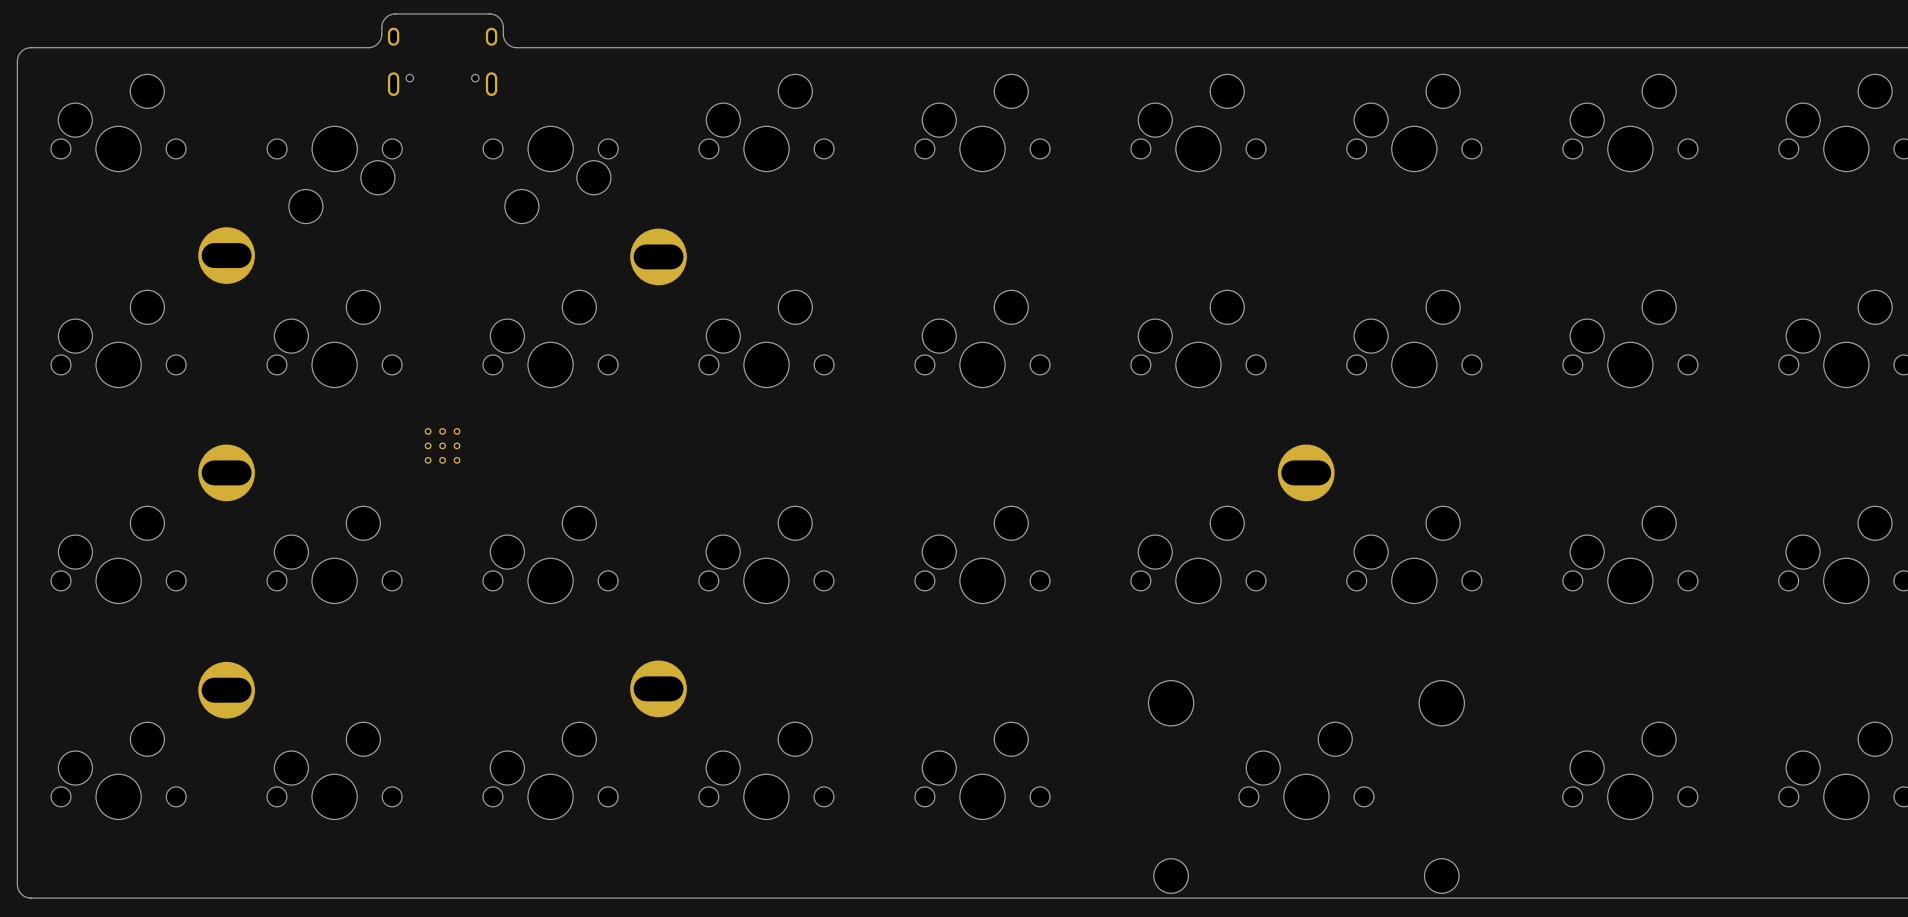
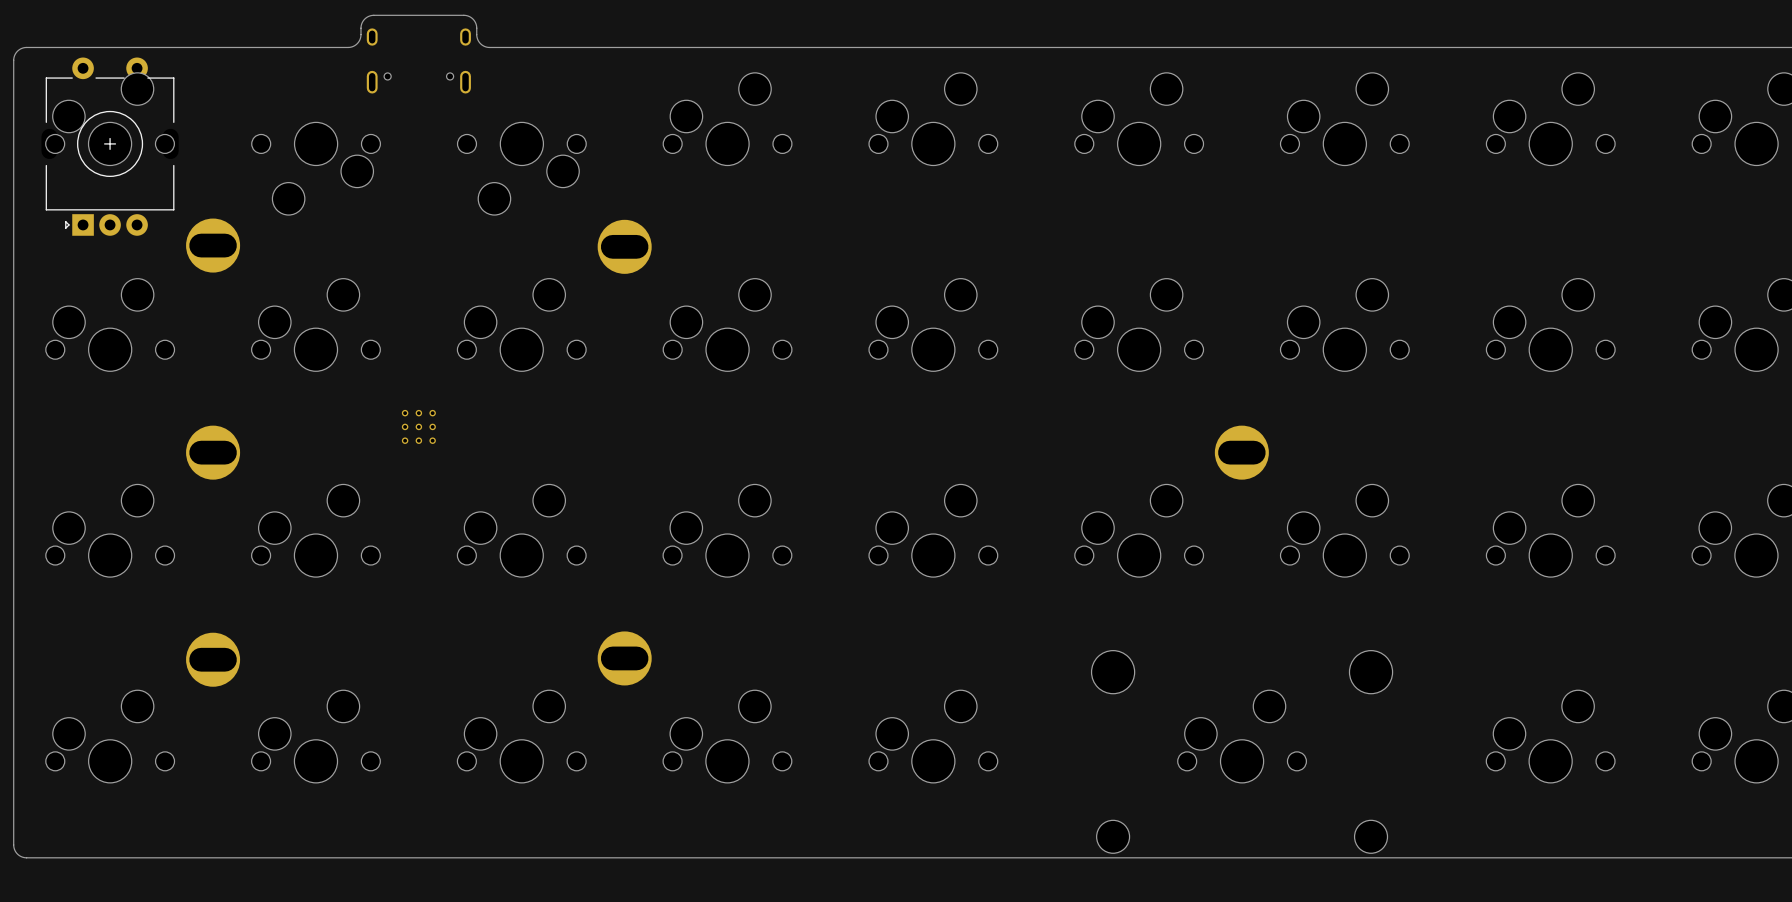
part: none -> (110, 146)

